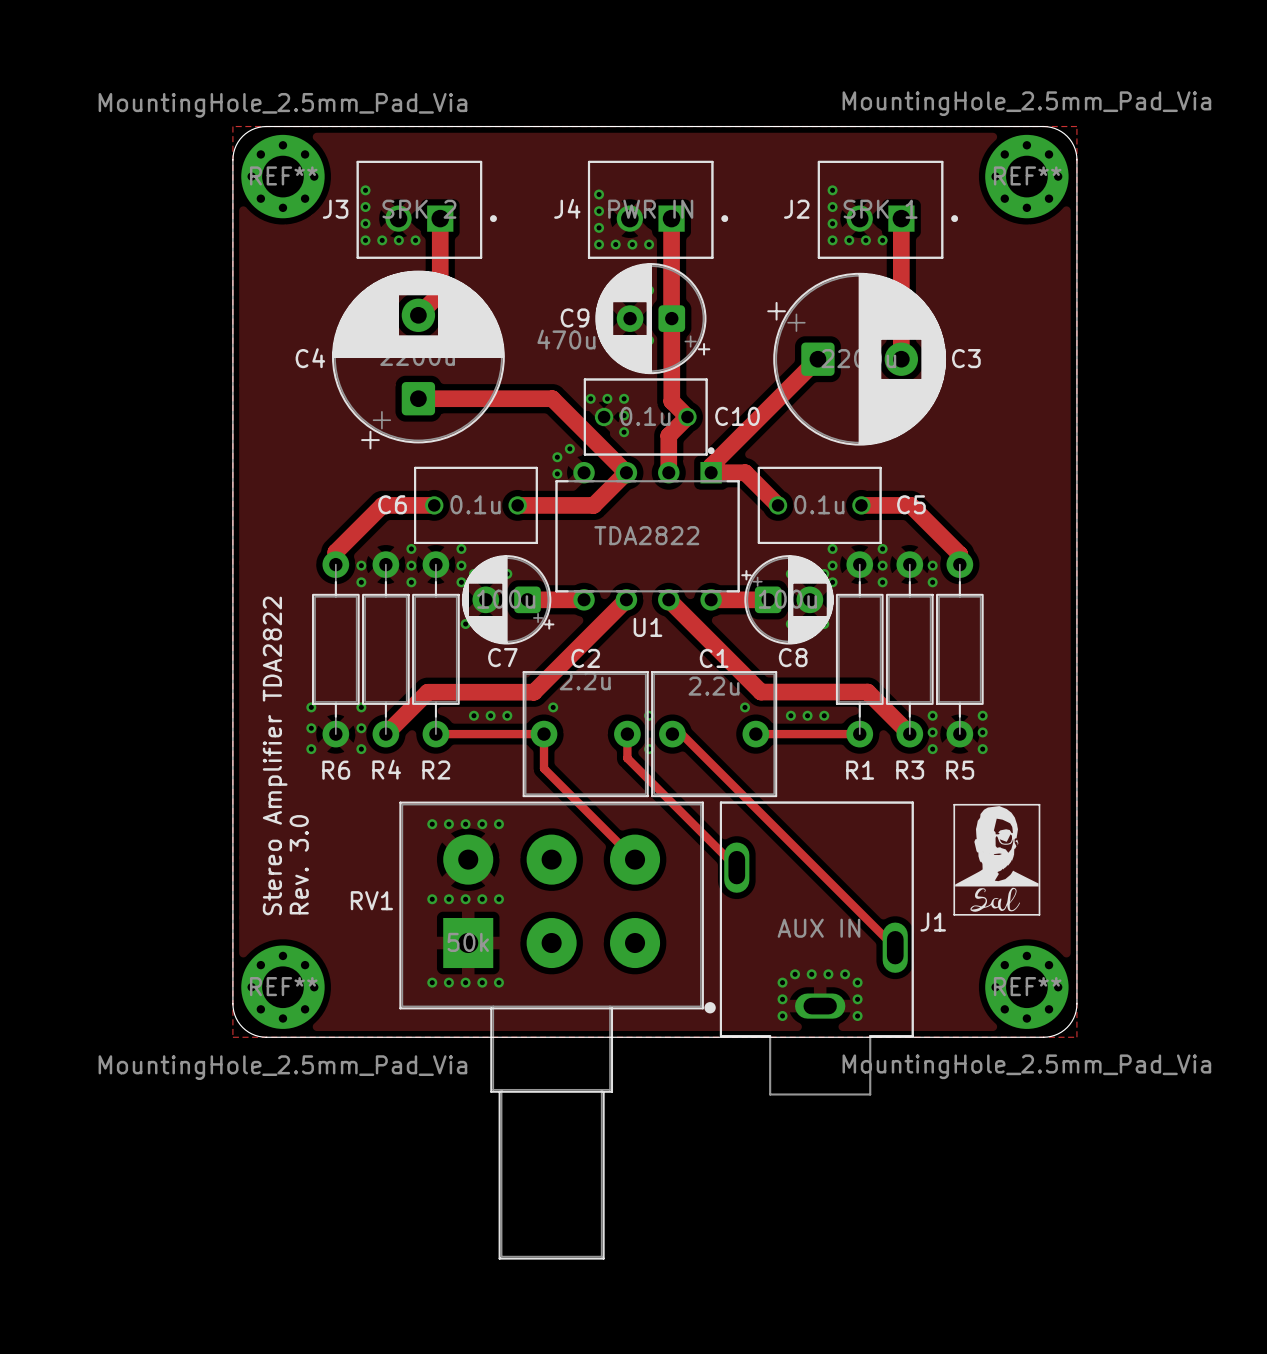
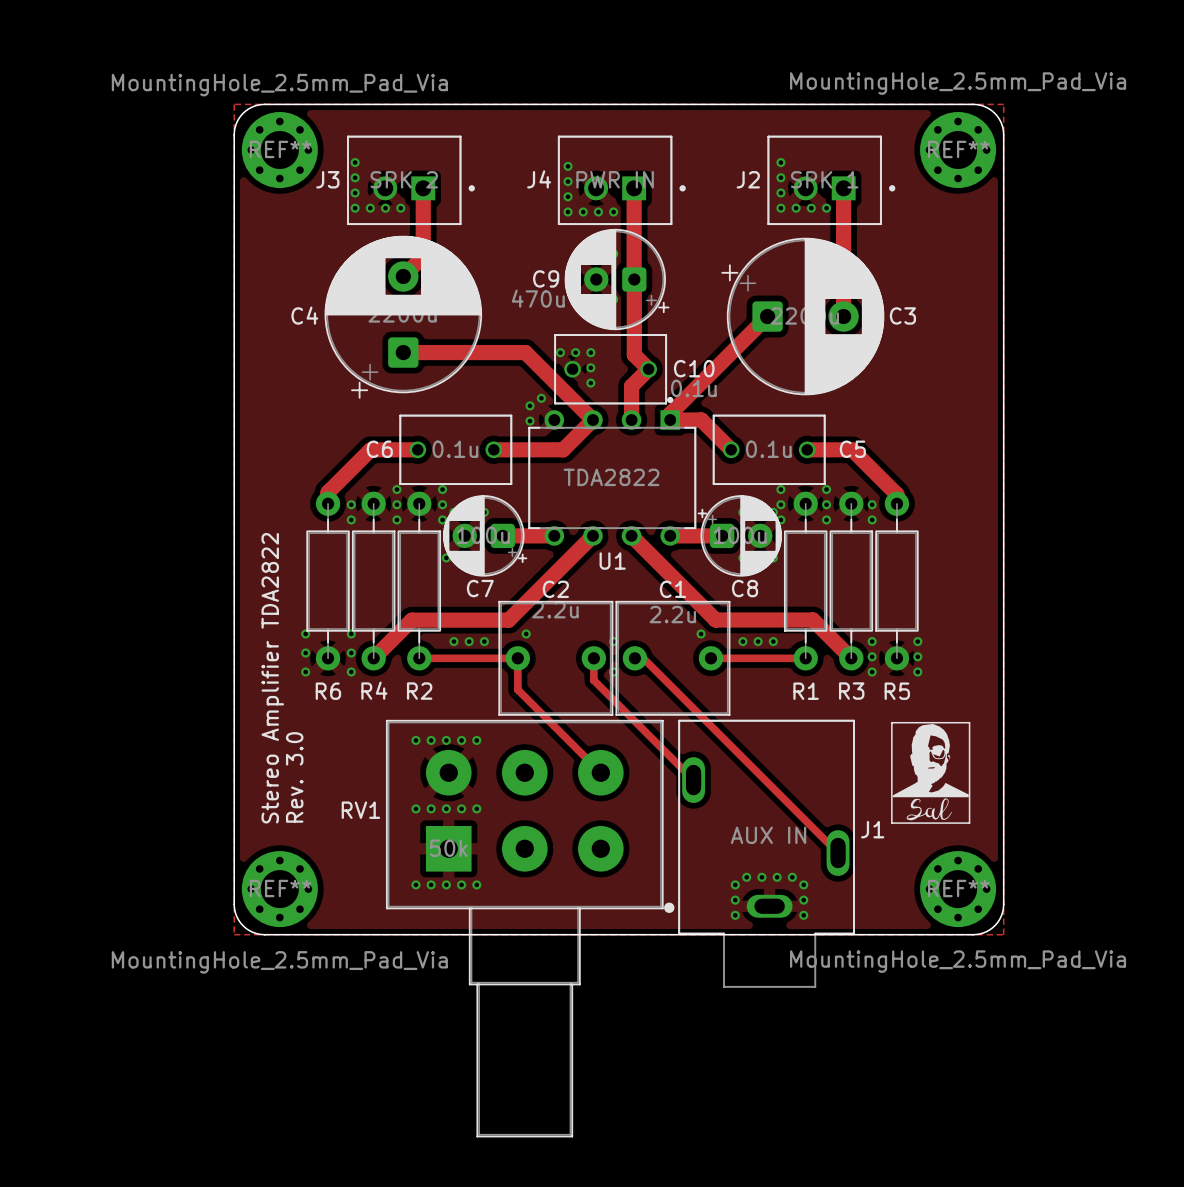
C10 value position: 0.1u (645, 416) -> 0.1u (693, 388)

